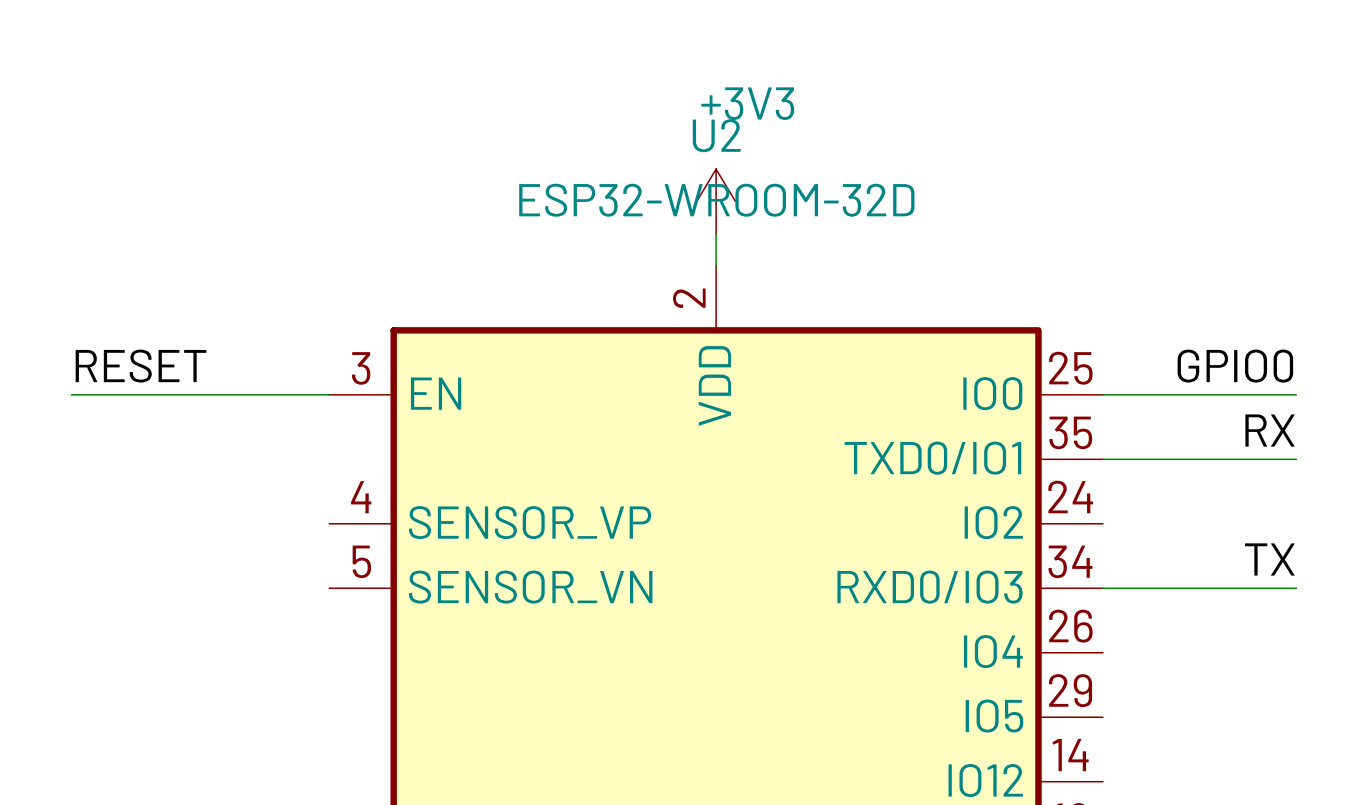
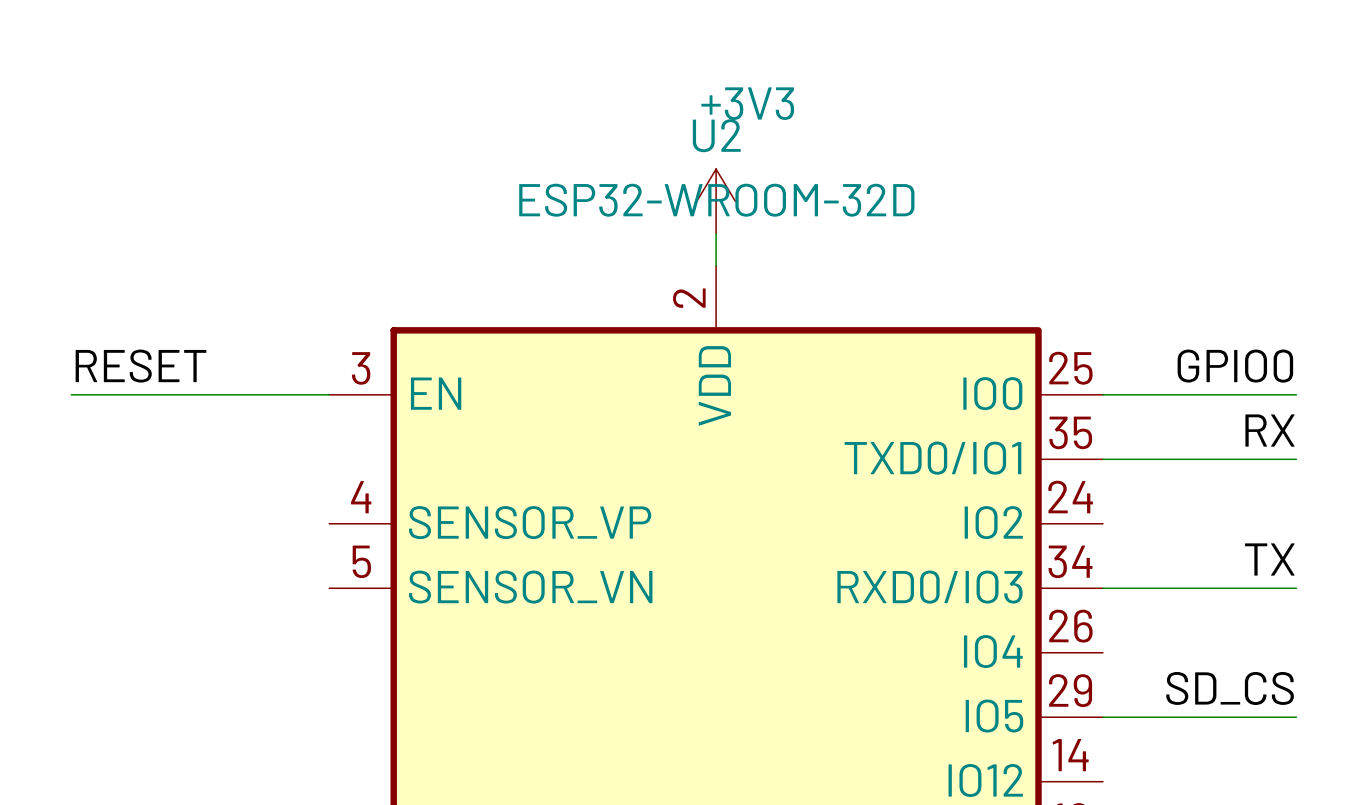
label: none -> SD_CS (1230, 688)
wire: none -> (1102, 717) (1296, 717)

